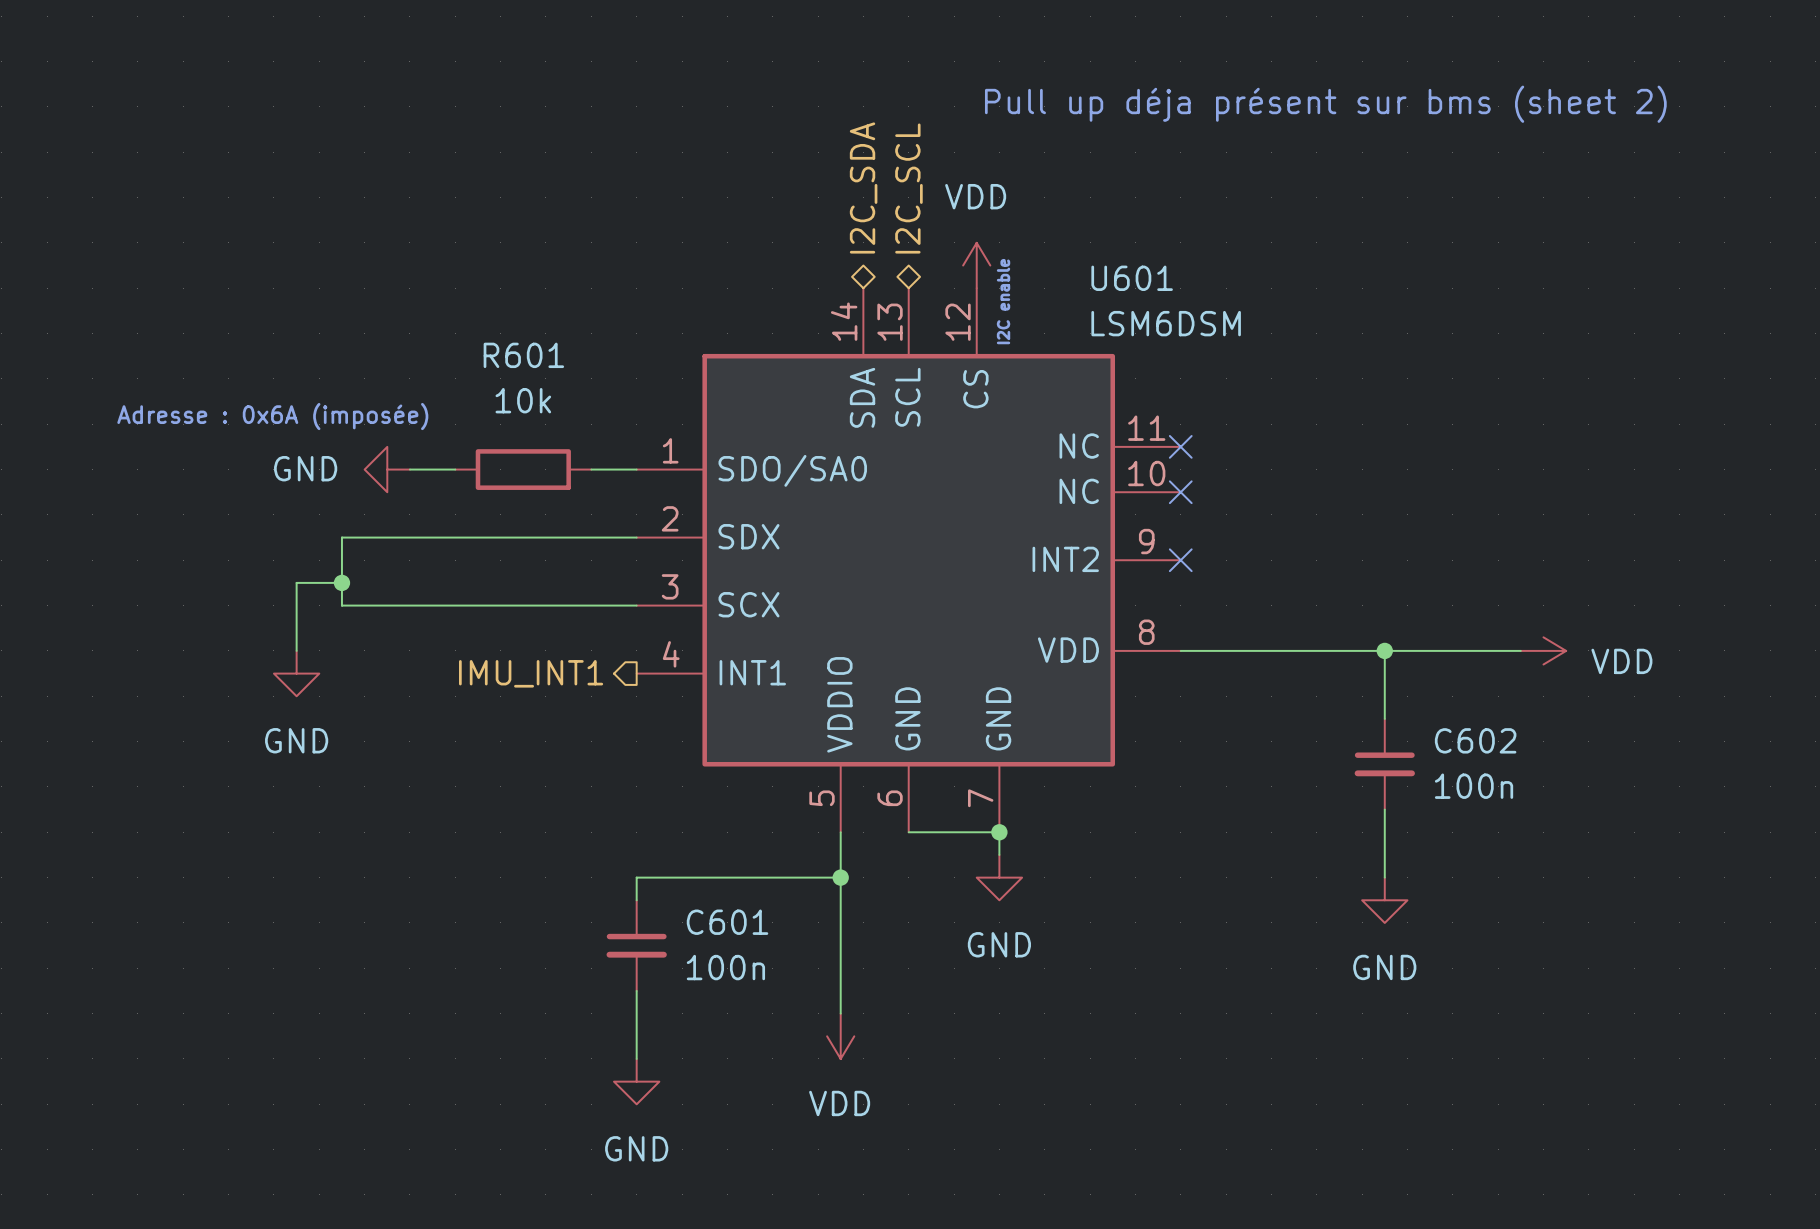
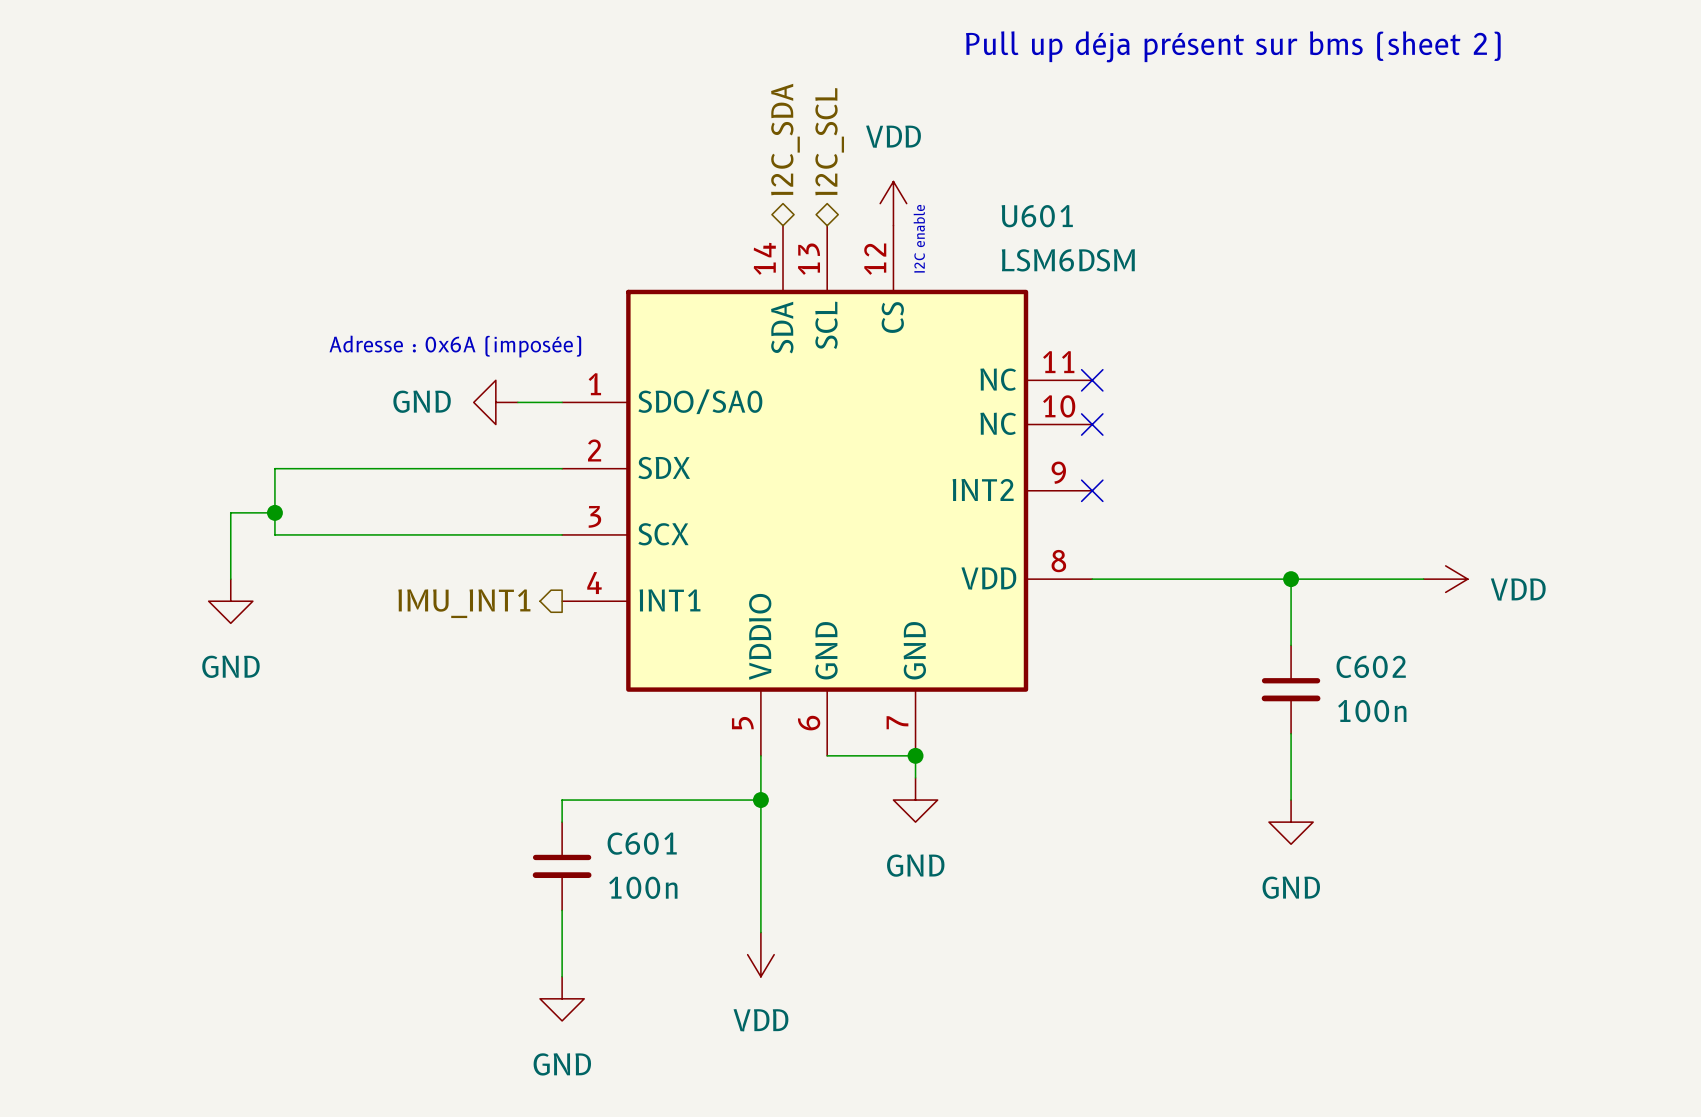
text position: Adresse : 0x6A (imposée) (272, 416) -> Adresse : 0x6A (imposée) (455, 346)
power symbol position: GND (387, 469) -> GND (495, 402)
wire: (409, 469) (455, 469) -> none
R601: 10k (523, 469) -> none

